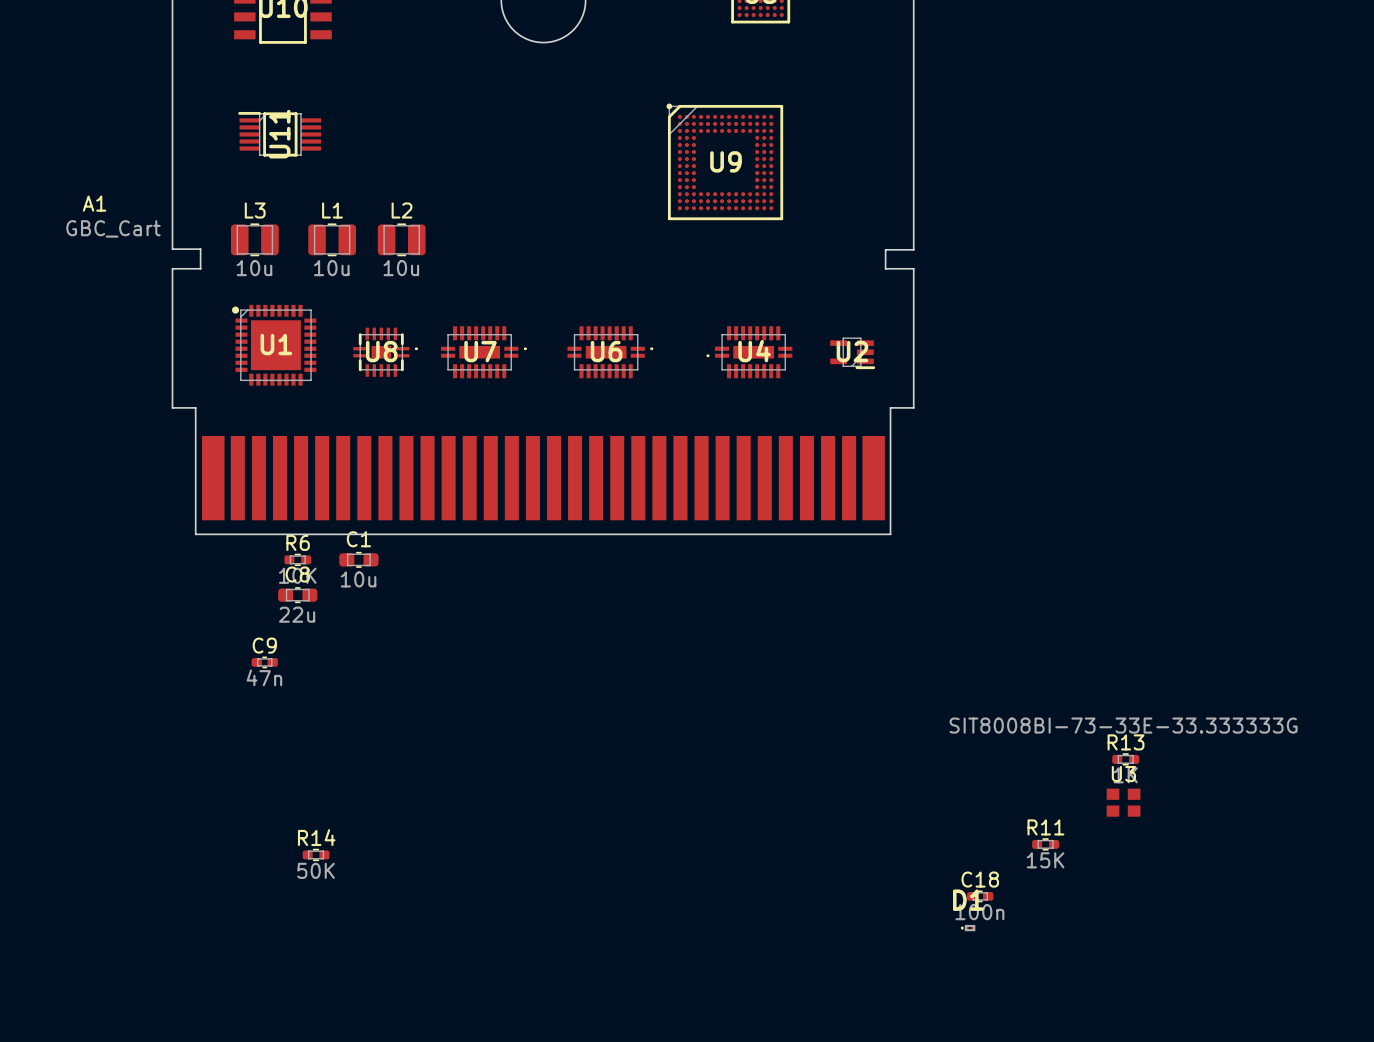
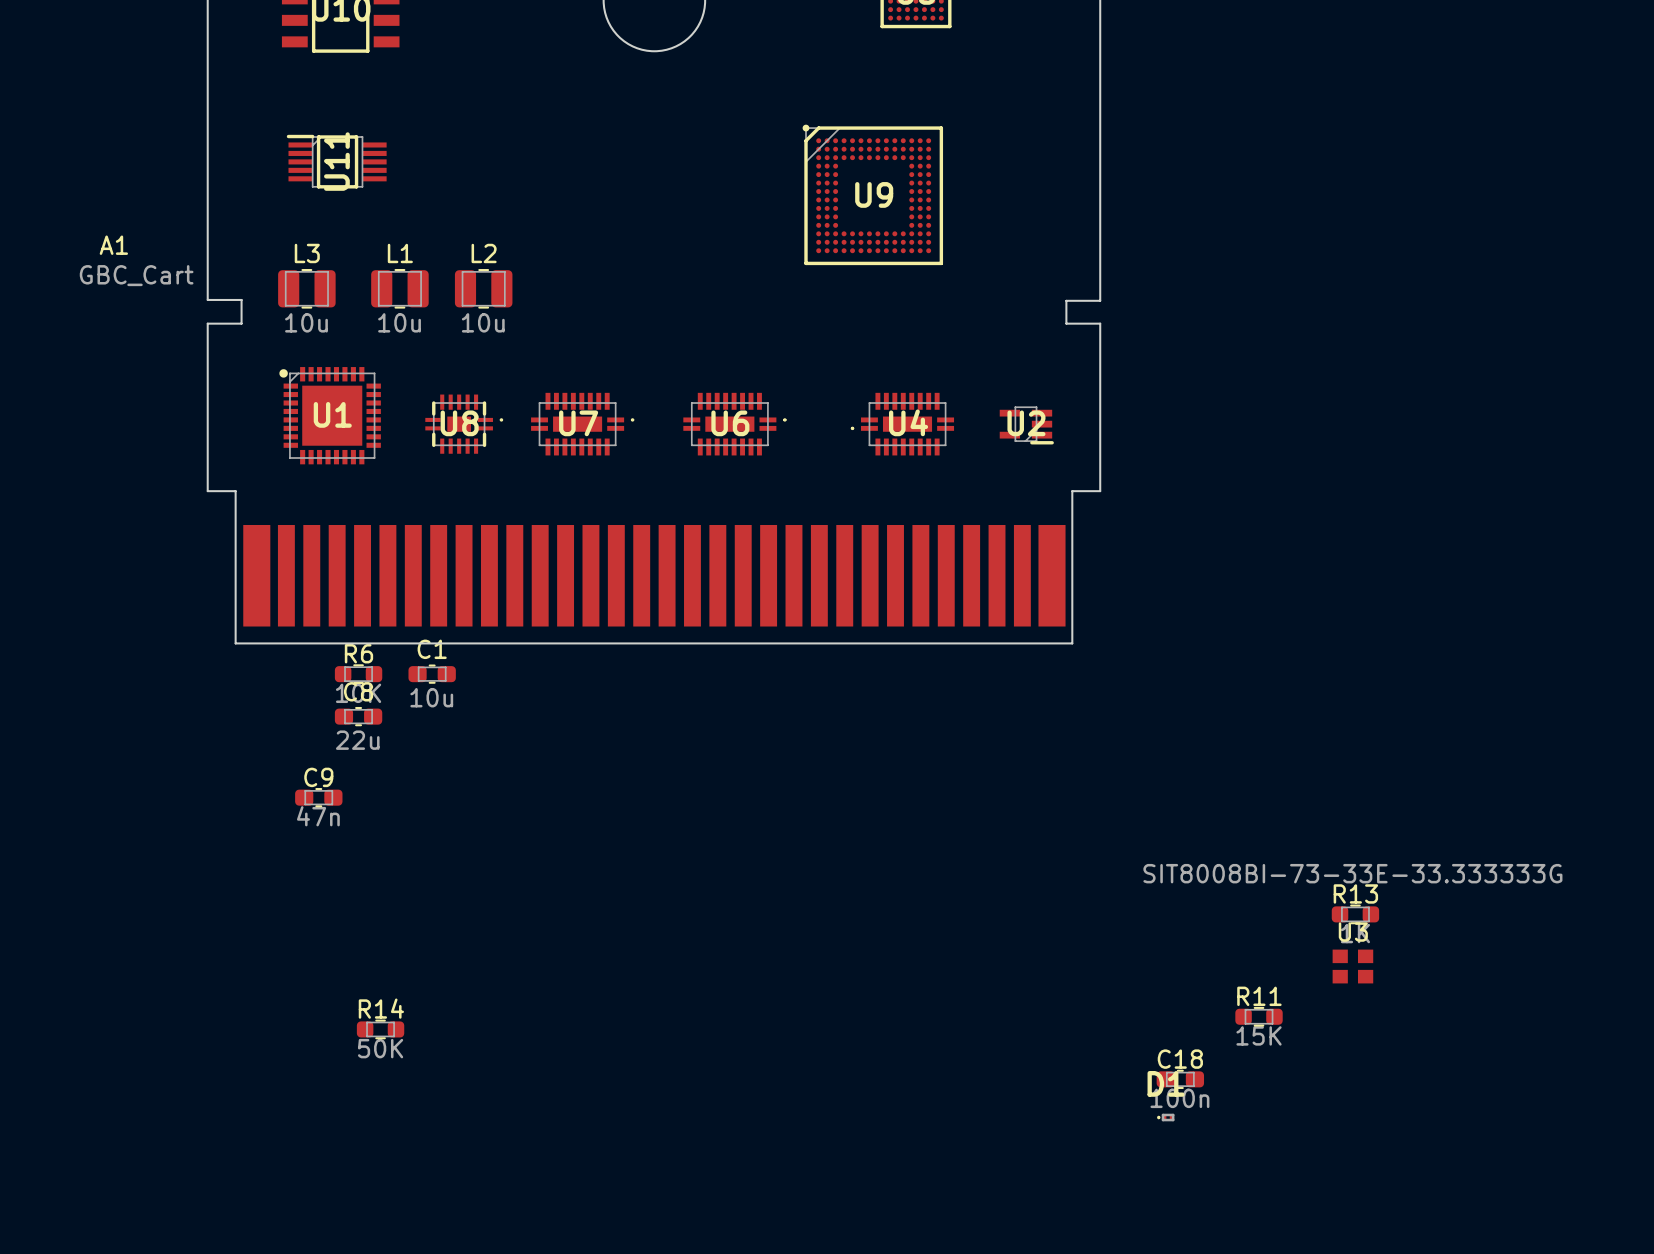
R6 footprint: [284, 553, 312, 567] -> [334, 664, 383, 684]
C9 footprint: [251, 656, 278, 669] -> [295, 788, 343, 808]
R13 footprint: [1112, 753, 1140, 766] -> [1331, 904, 1380, 925]
R11 footprint: [1032, 838, 1060, 851] -> [1235, 1006, 1283, 1027]
R14 footprint: [302, 848, 330, 862] -> [356, 1019, 405, 1040]
C18 footprint: [967, 890, 994, 903] -> [1156, 1069, 1205, 1090]

